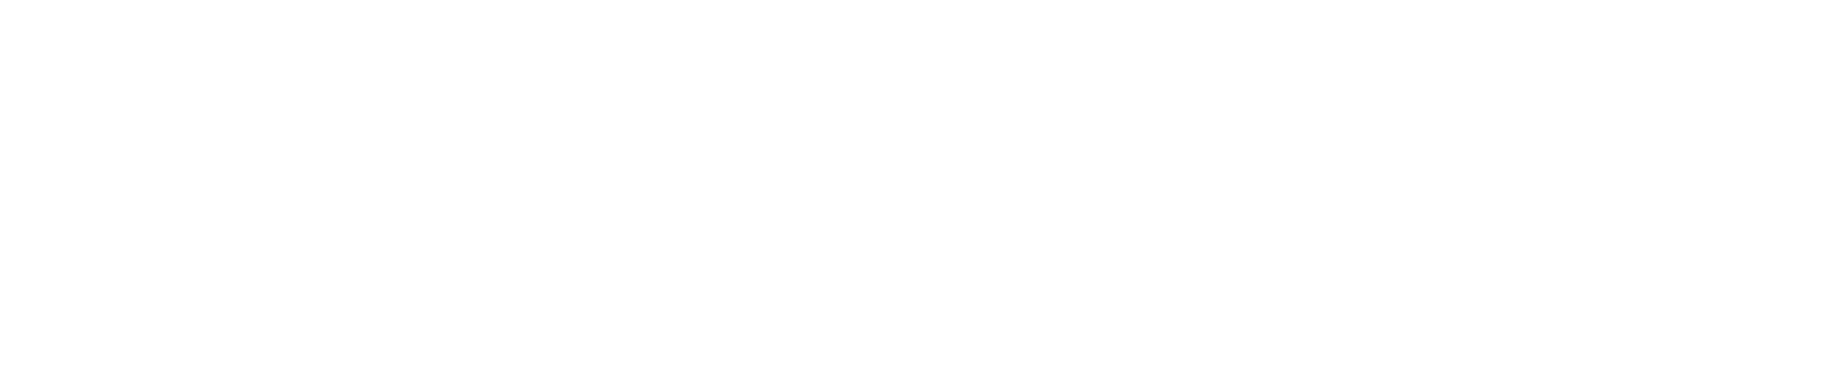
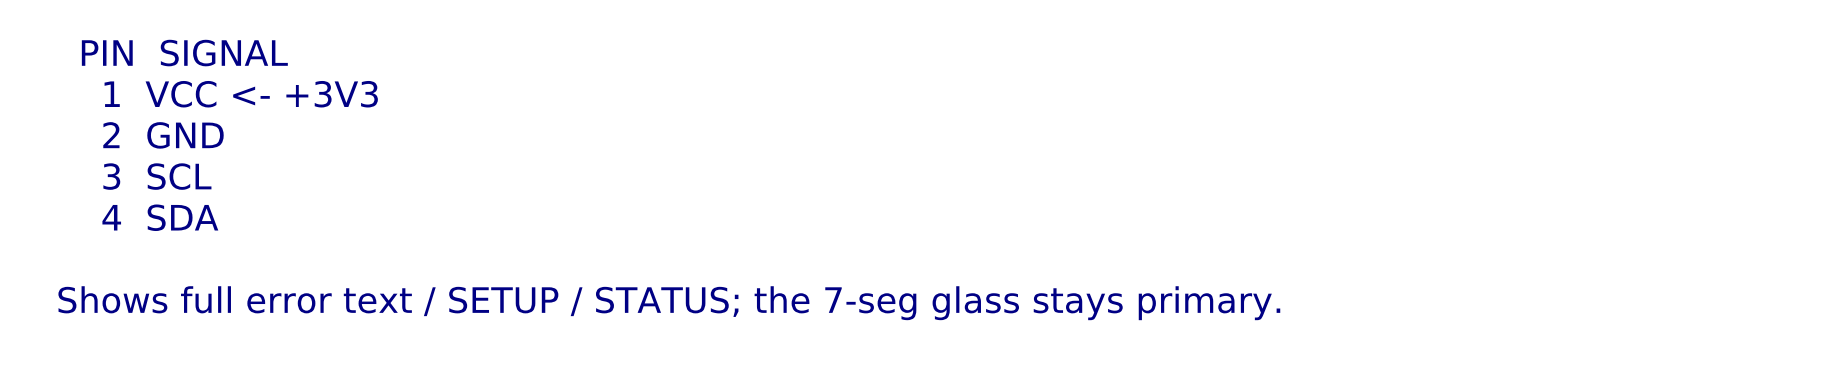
text: none -> PIN SIGNAL (184, 53)
text: none -> 1 VCC <- +3V3 (241, 94)
text: none -> 2 GND (163, 135)
text: none -> 3 SCL (157, 176)
text: none -> 4 SDA (160, 217)
text: none -> Shows full error text / SETUP / STATUS; the 7-seg glass stays primary. (669, 303)

